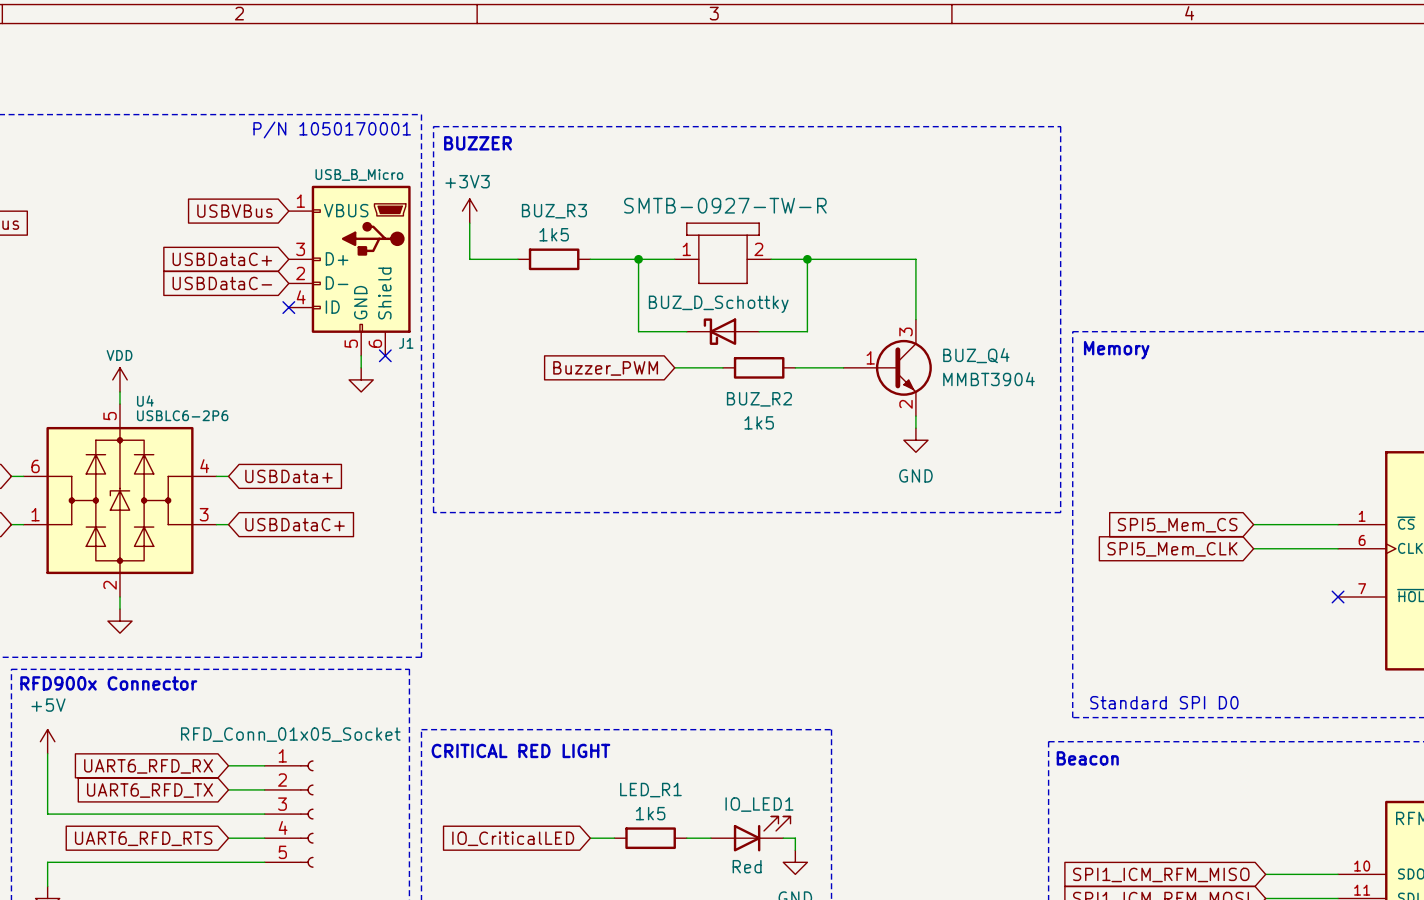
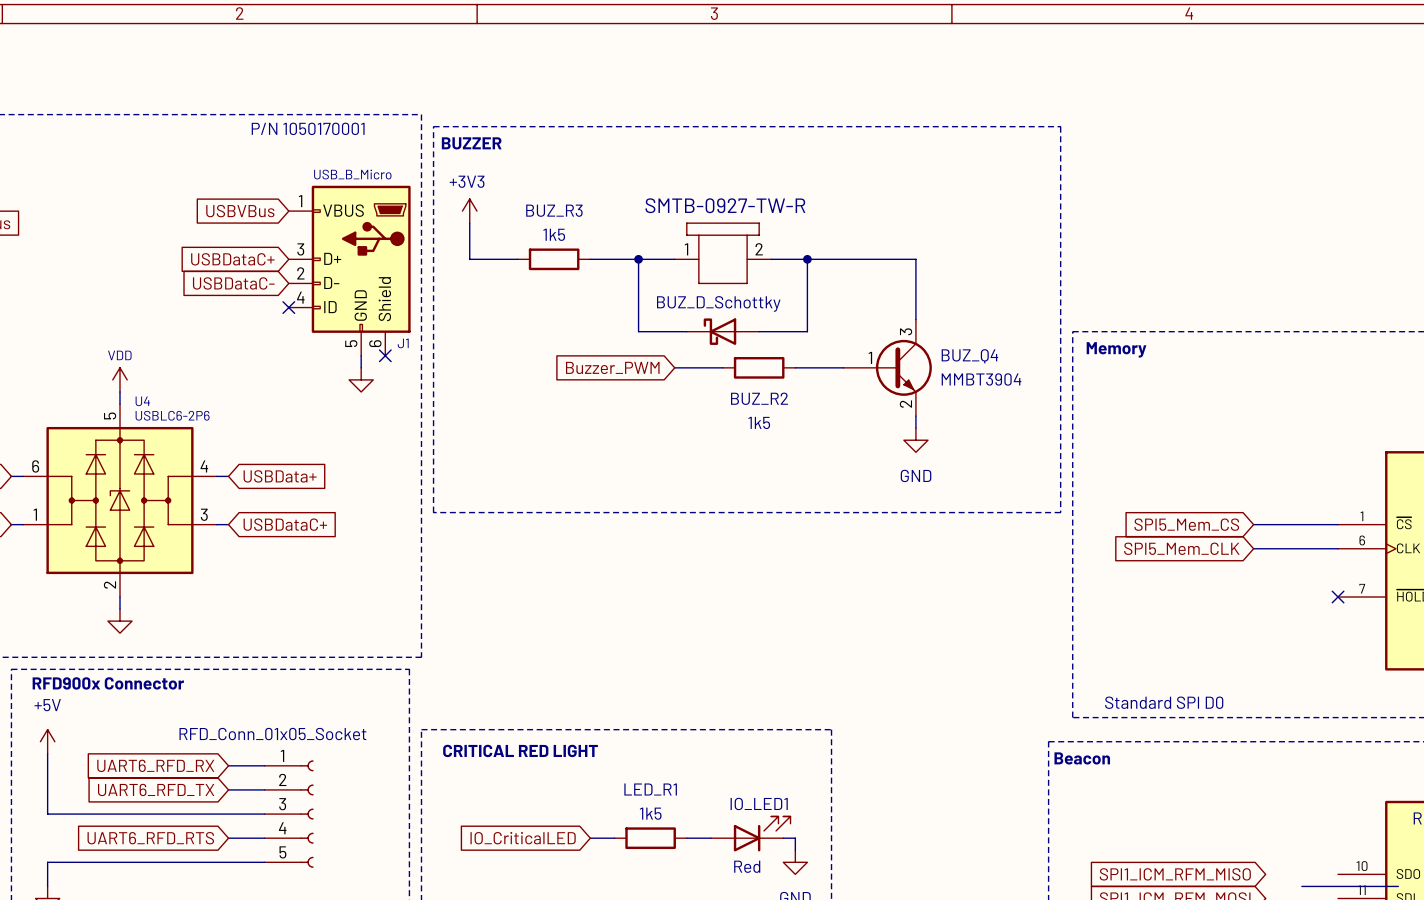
wire: (1265, 874) (1338, 874) -> none
wire: none -> (1301, 886) (1398, 886)
wire: (1265, 898) (1338, 898) -> none

